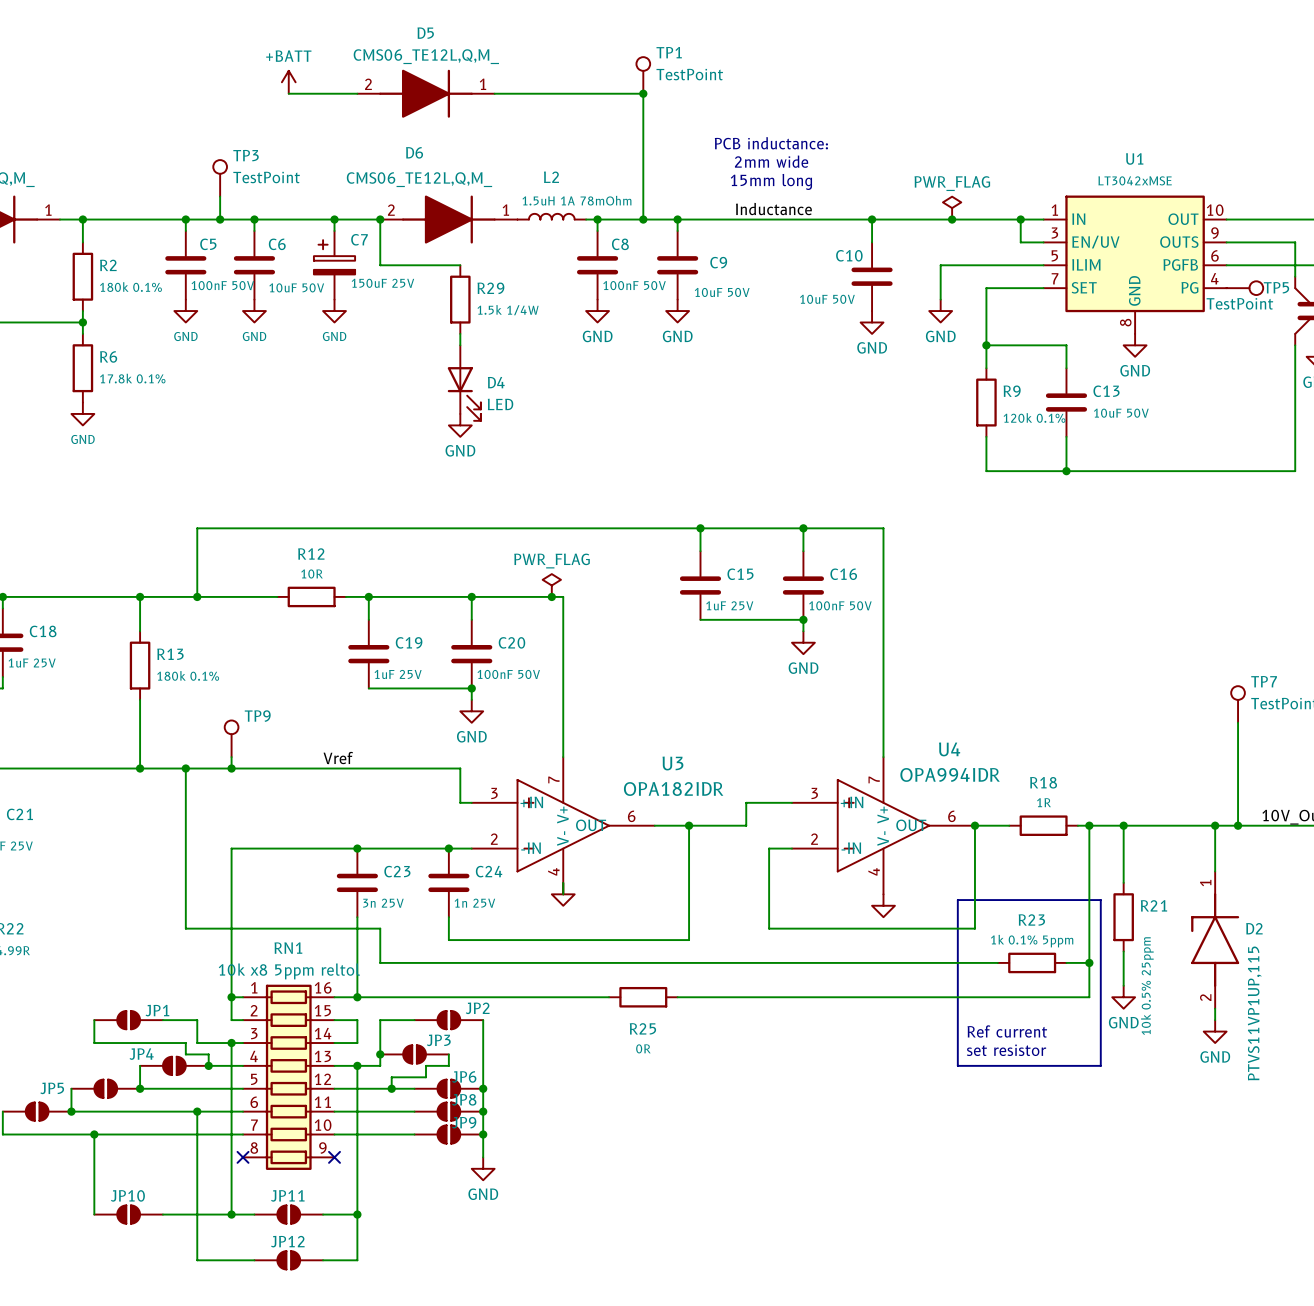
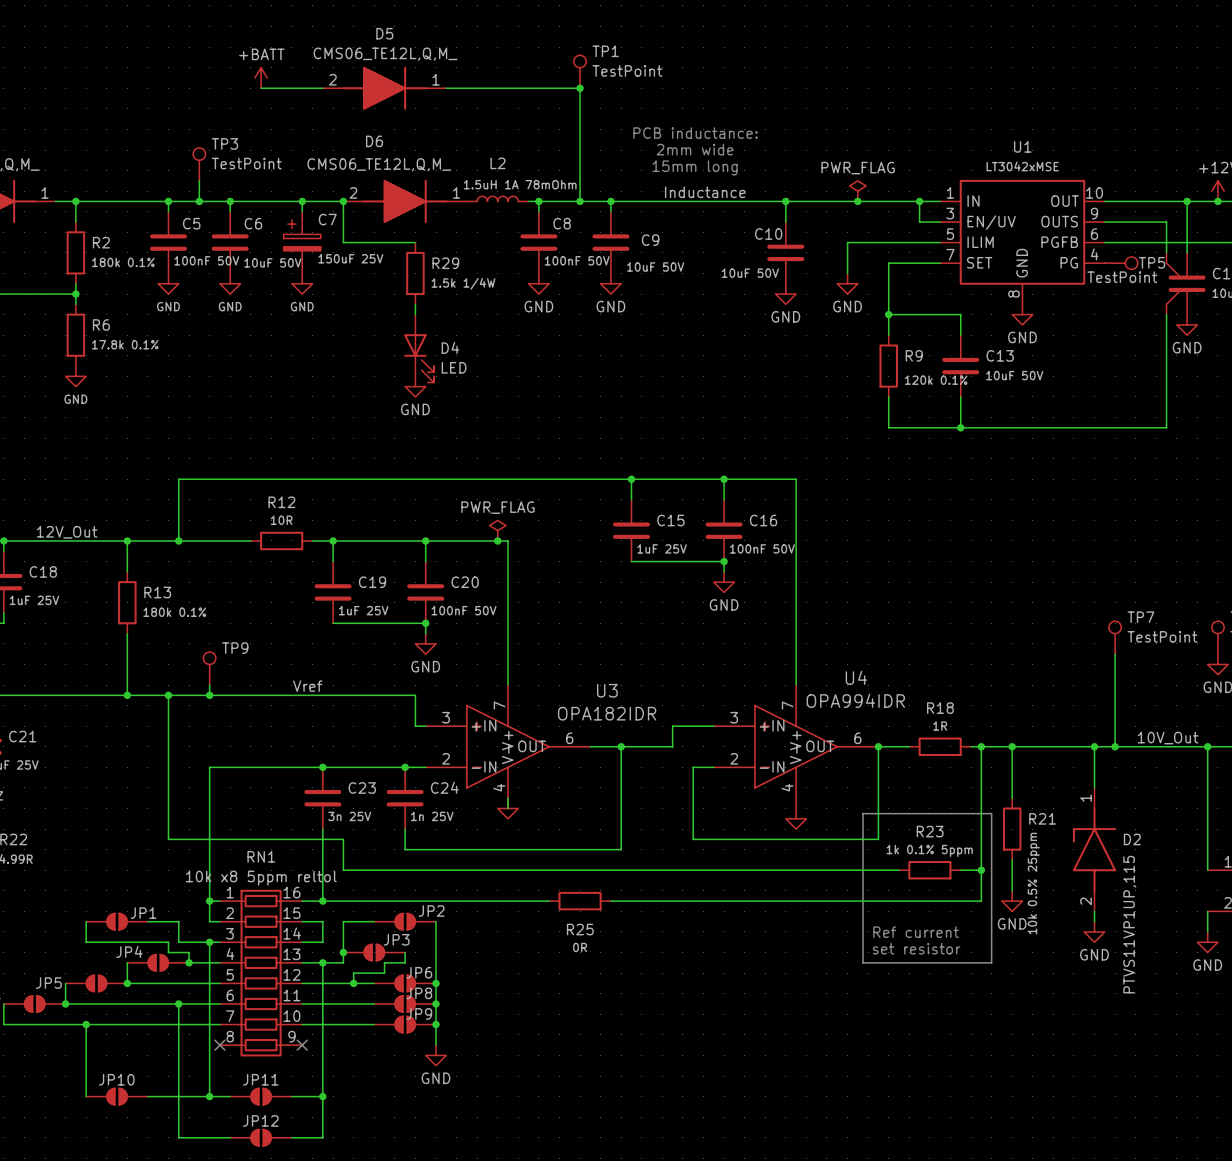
label: none -> 12V_Out (67, 532)

